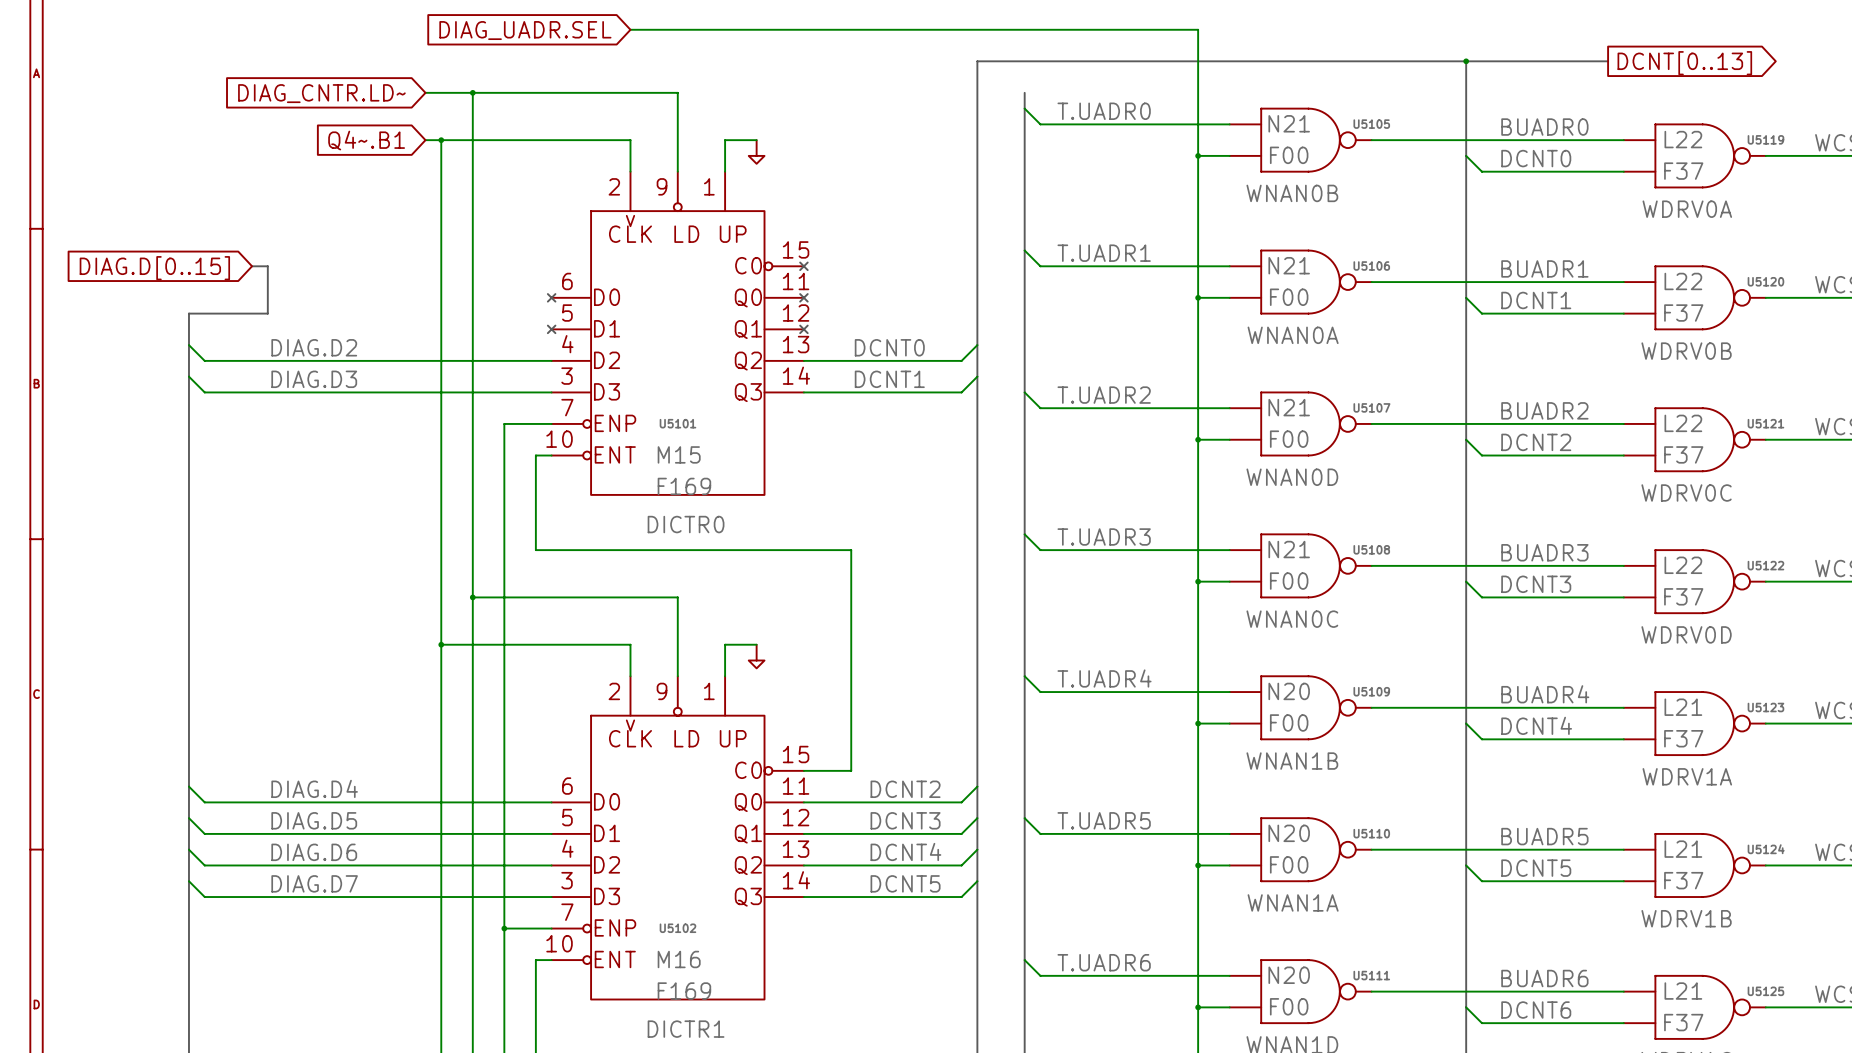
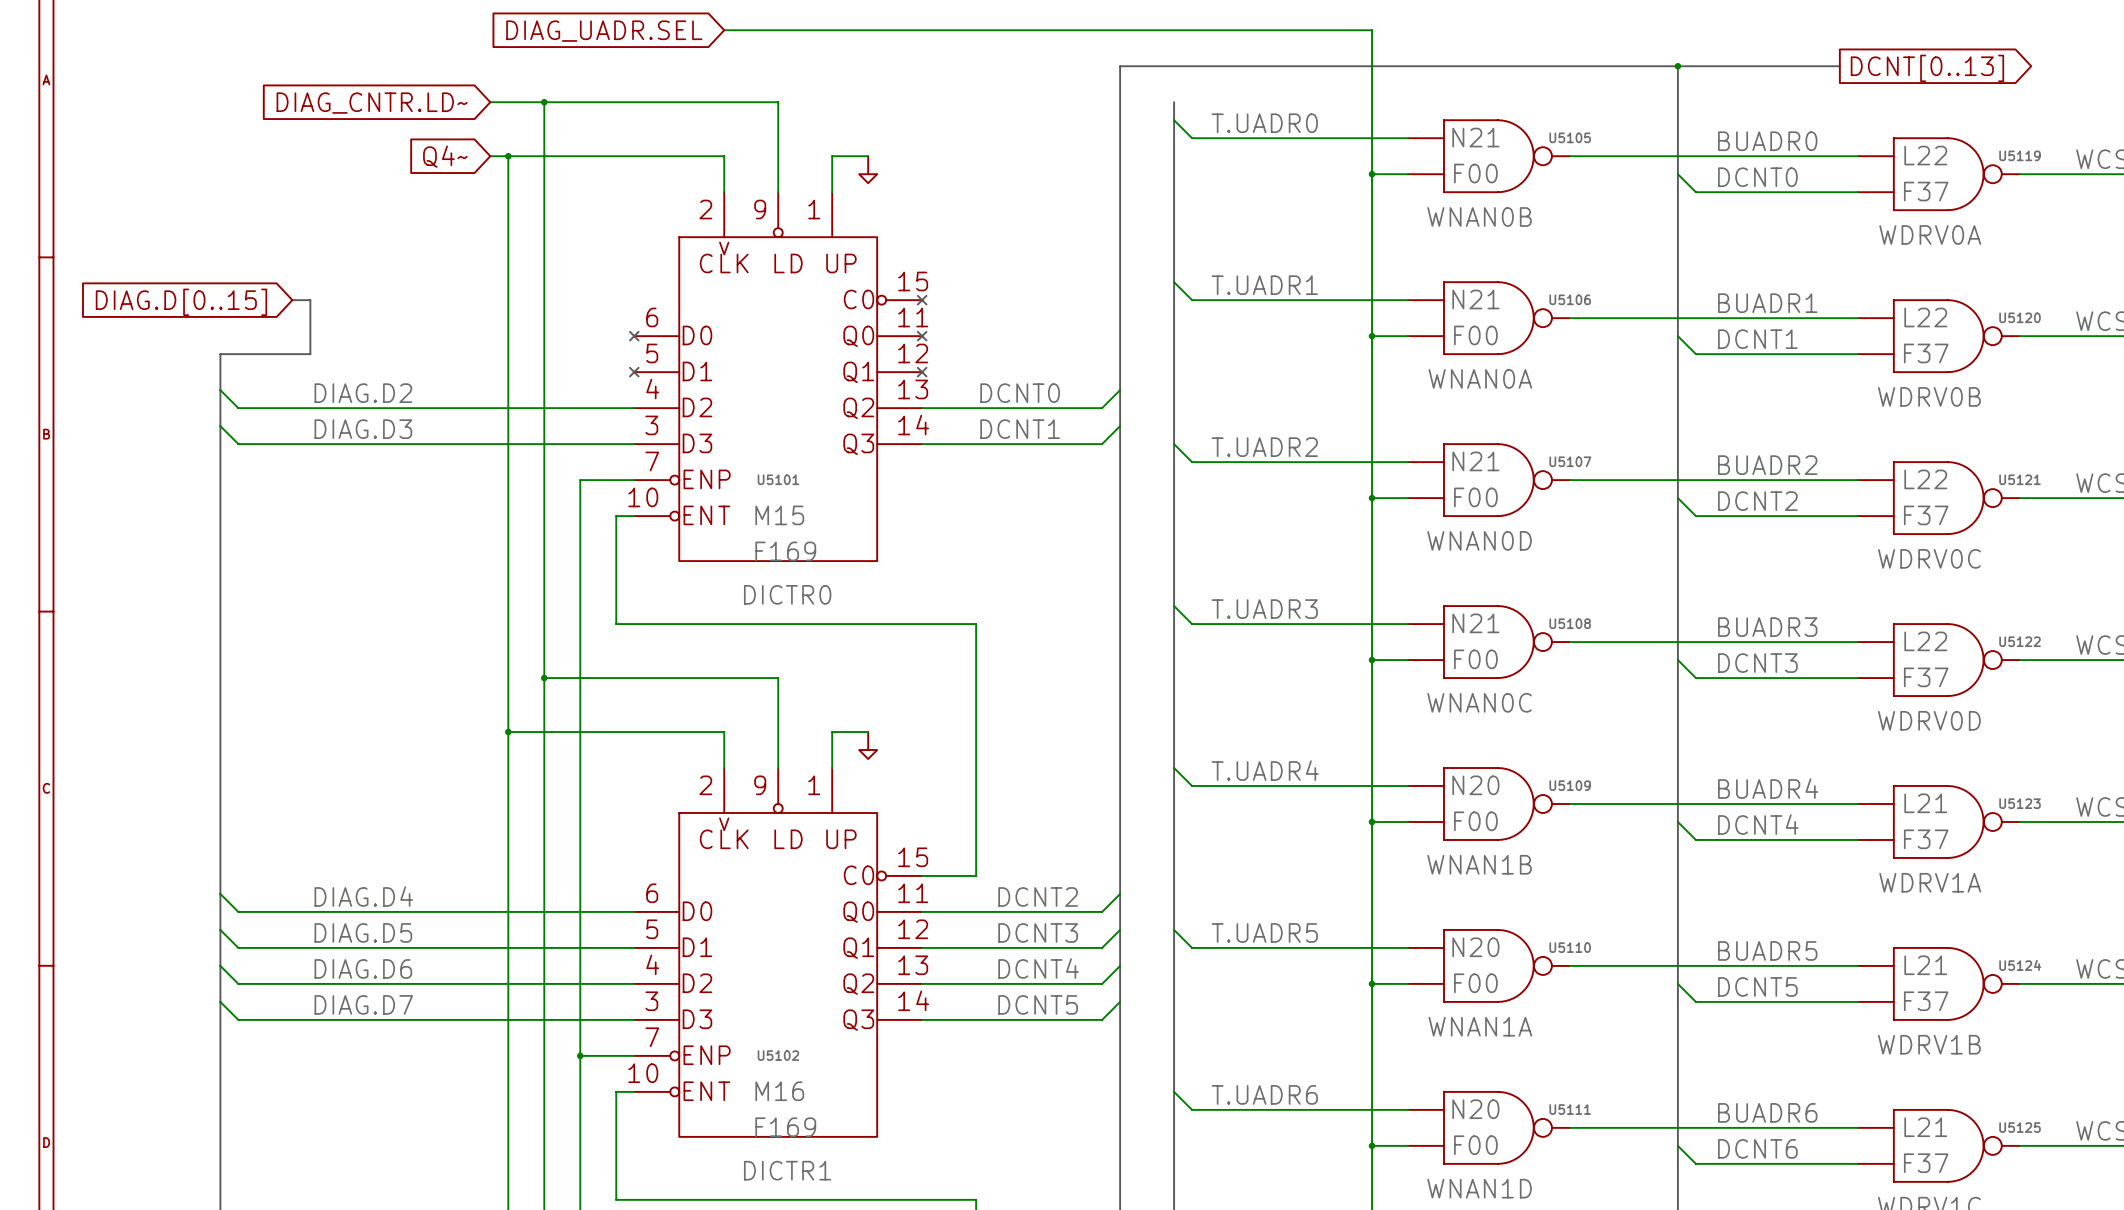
global label: Q4~.B1 (366, 140) -> Q4~ (445, 156)

